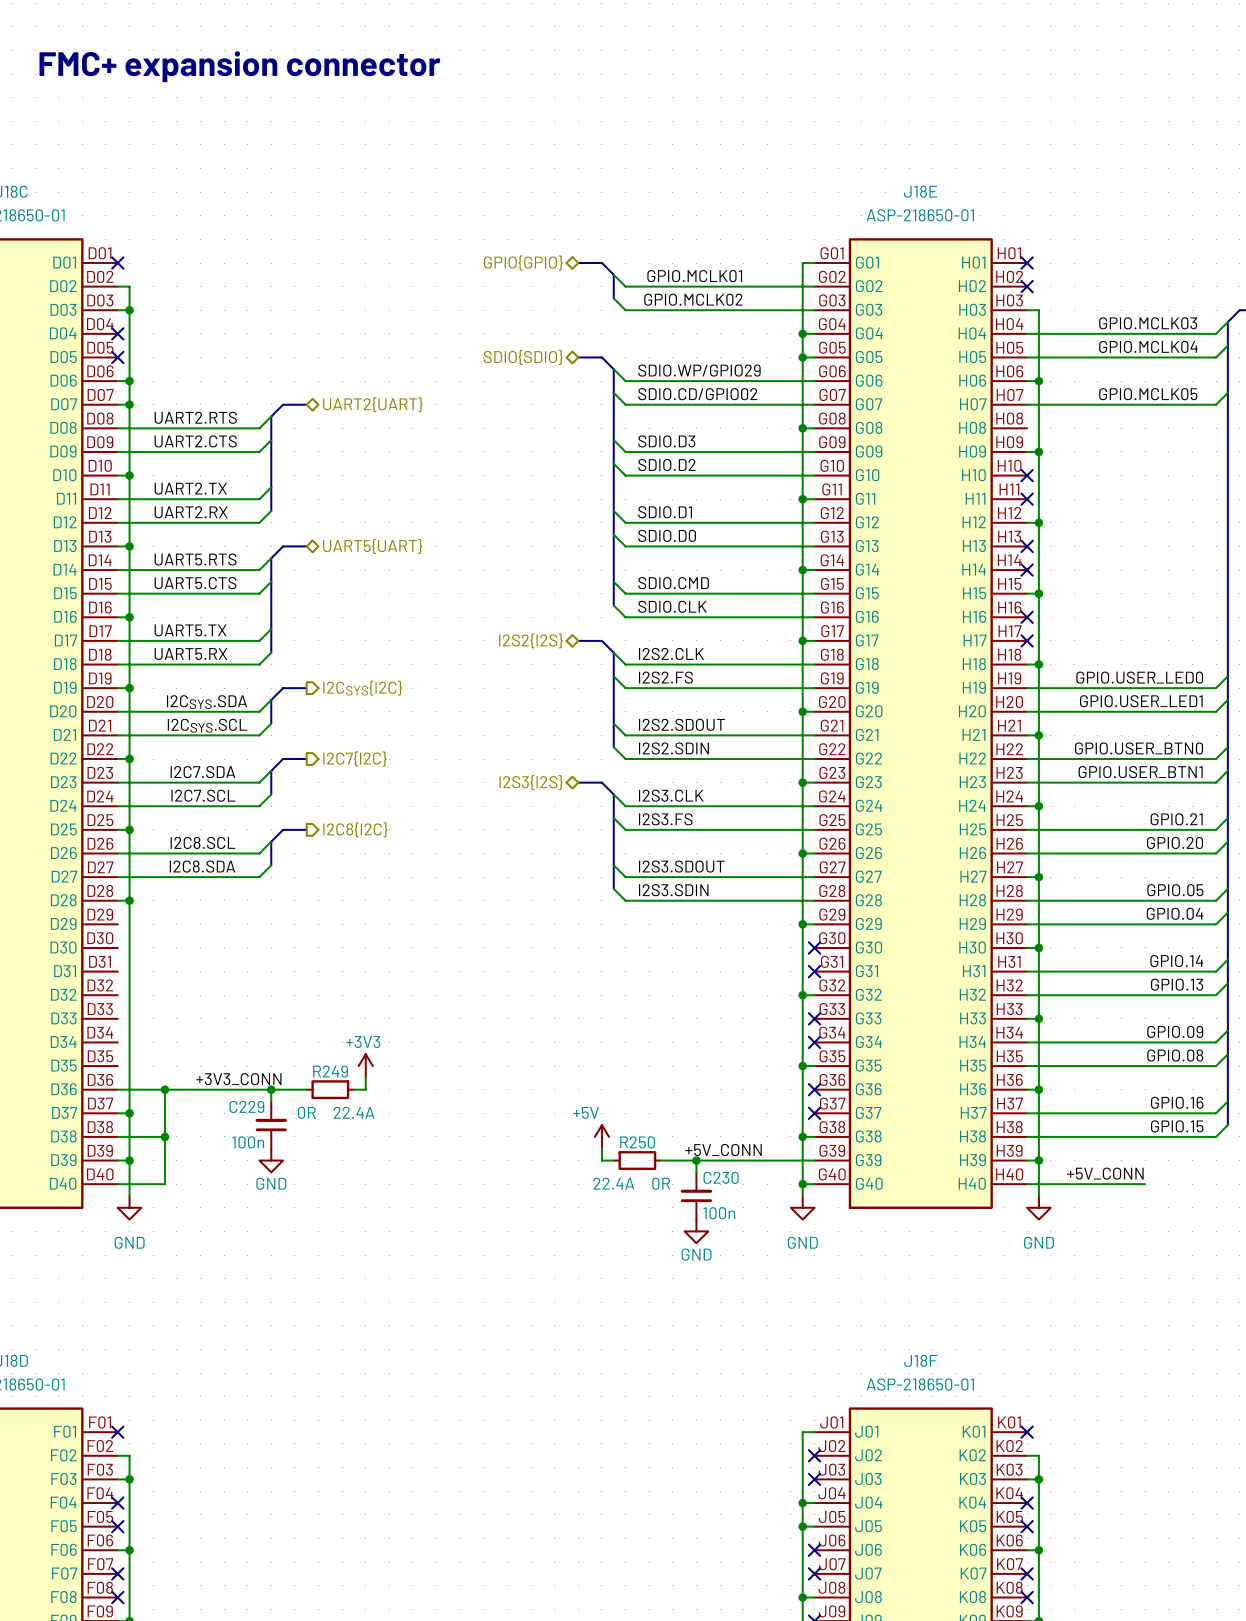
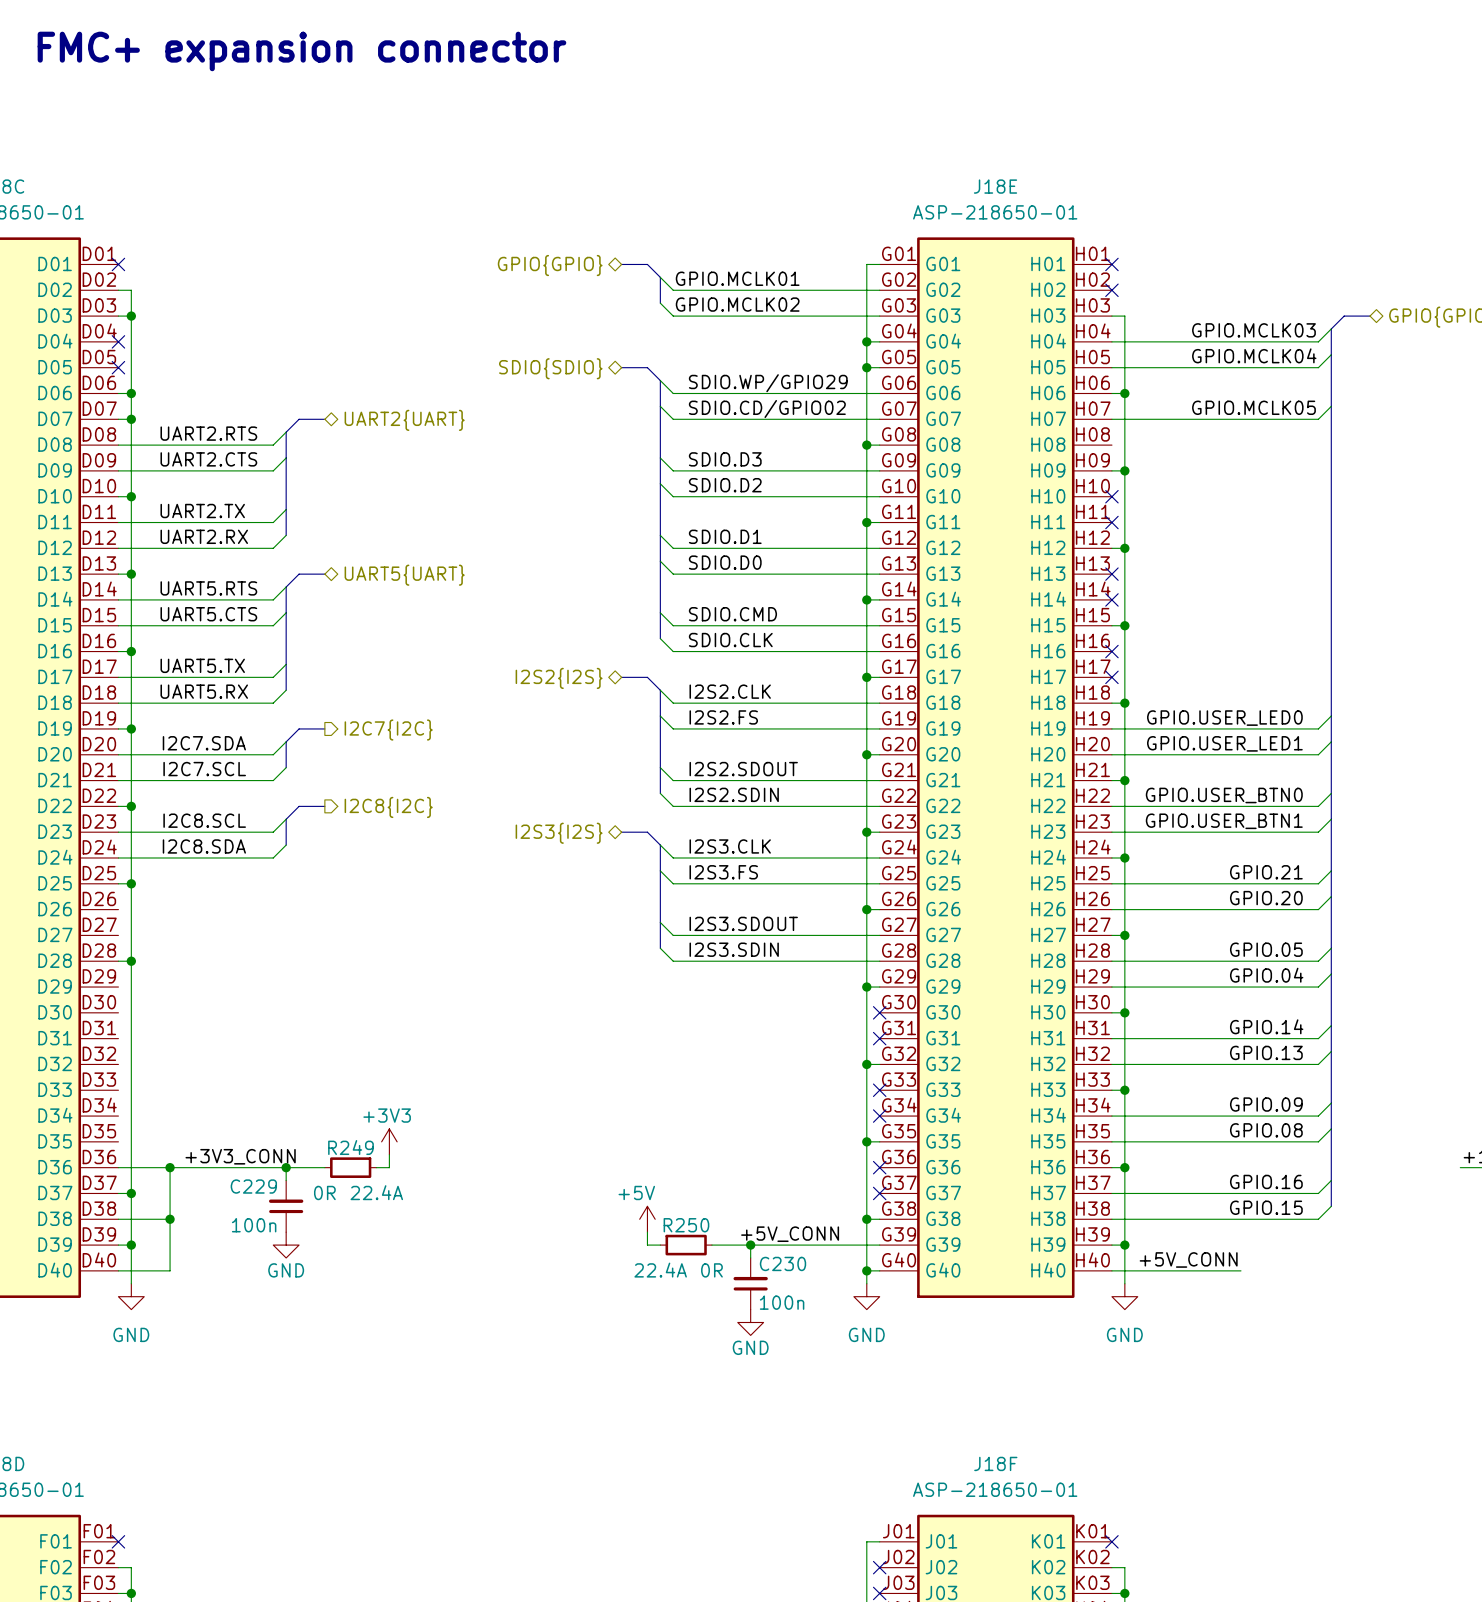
hierarchical label: I2CSYS{I2C} (362, 688) -> I2C7{I2C} (388, 730)
label: I2CSYS.SDA (207, 702) -> I2C7.SDA (204, 743)
label: I2CSYS.SCL (207, 725) -> I2C7.SCL (204, 769)
hierarchical label: I2C7{I2C} (354, 758) -> I2C8{I2C} (388, 807)
label: I2C7.SDA (202, 772) -> I2C8.SCL (204, 820)
label: I2C7.SCL (203, 795) -> I2C8.SDA (204, 846)
bus: (306, 829) (283, 829) (271, 841) (271, 865) -> none
hierarchical label: I2C8{I2C} (355, 829) -> none
wire: (271, 841) (259, 853) (117, 853) -> none
label: I2C8.SCL (202, 842) -> none
wire: (271, 865) (259, 877) (117, 877) -> none
label: I2C8.SDA (202, 866) -> none

